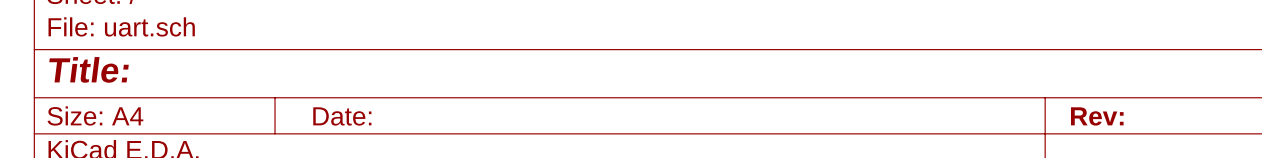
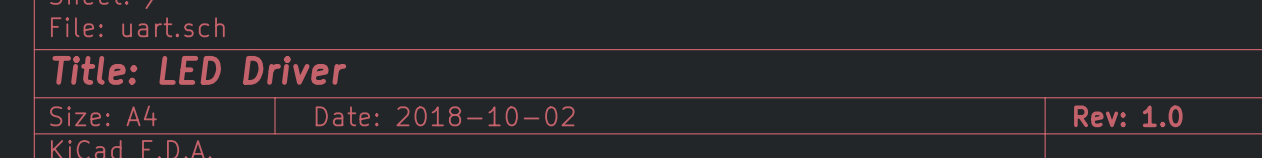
title block: Title: (89, 69) -> Title: LED Driver (199, 70)
title block: Date: (342, 116) -> Date: 2018-10-02 (445, 116)
title block: Rev: (1097, 116) -> Rev: 1.0 (1128, 116)

